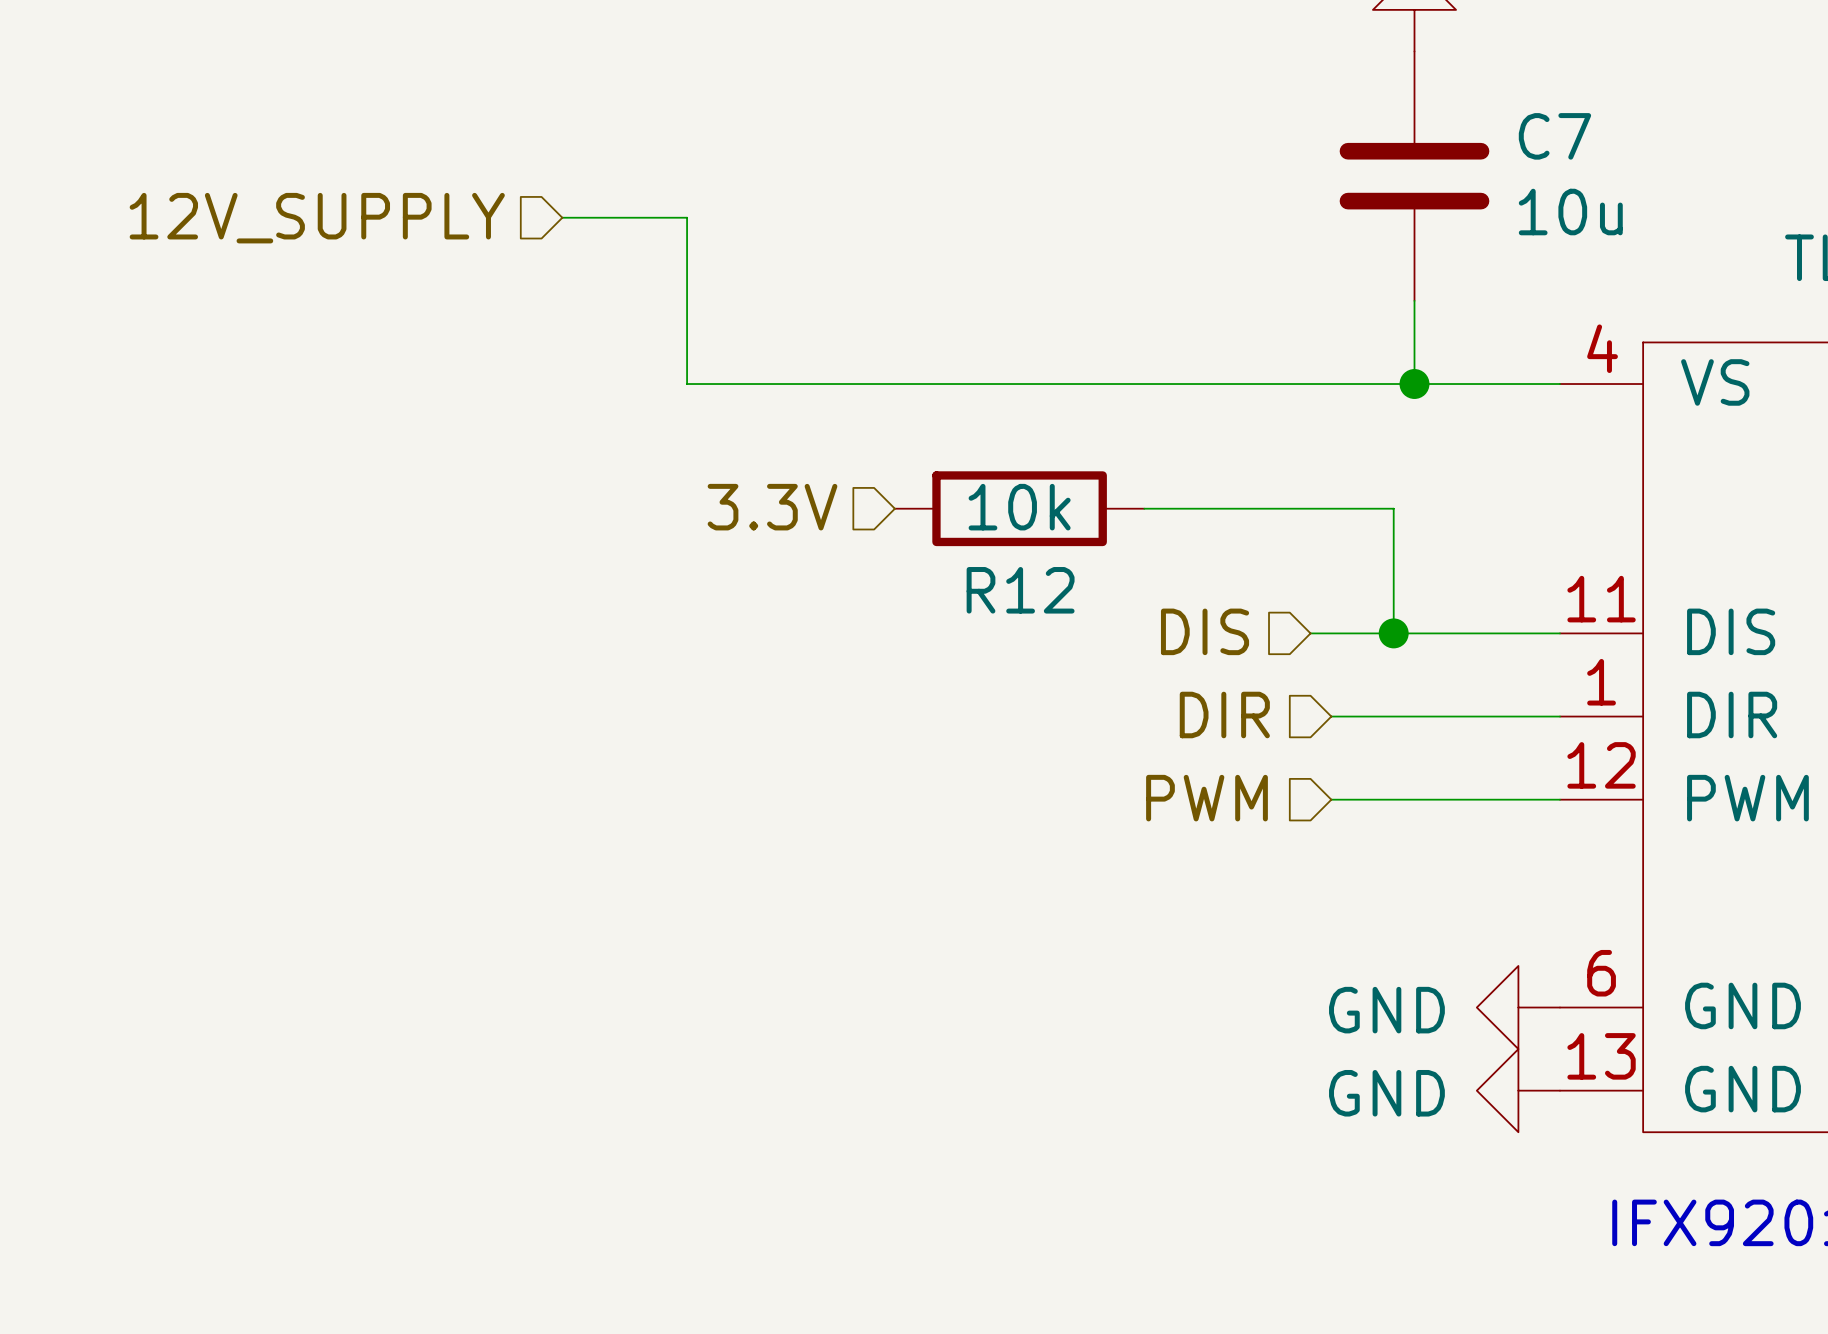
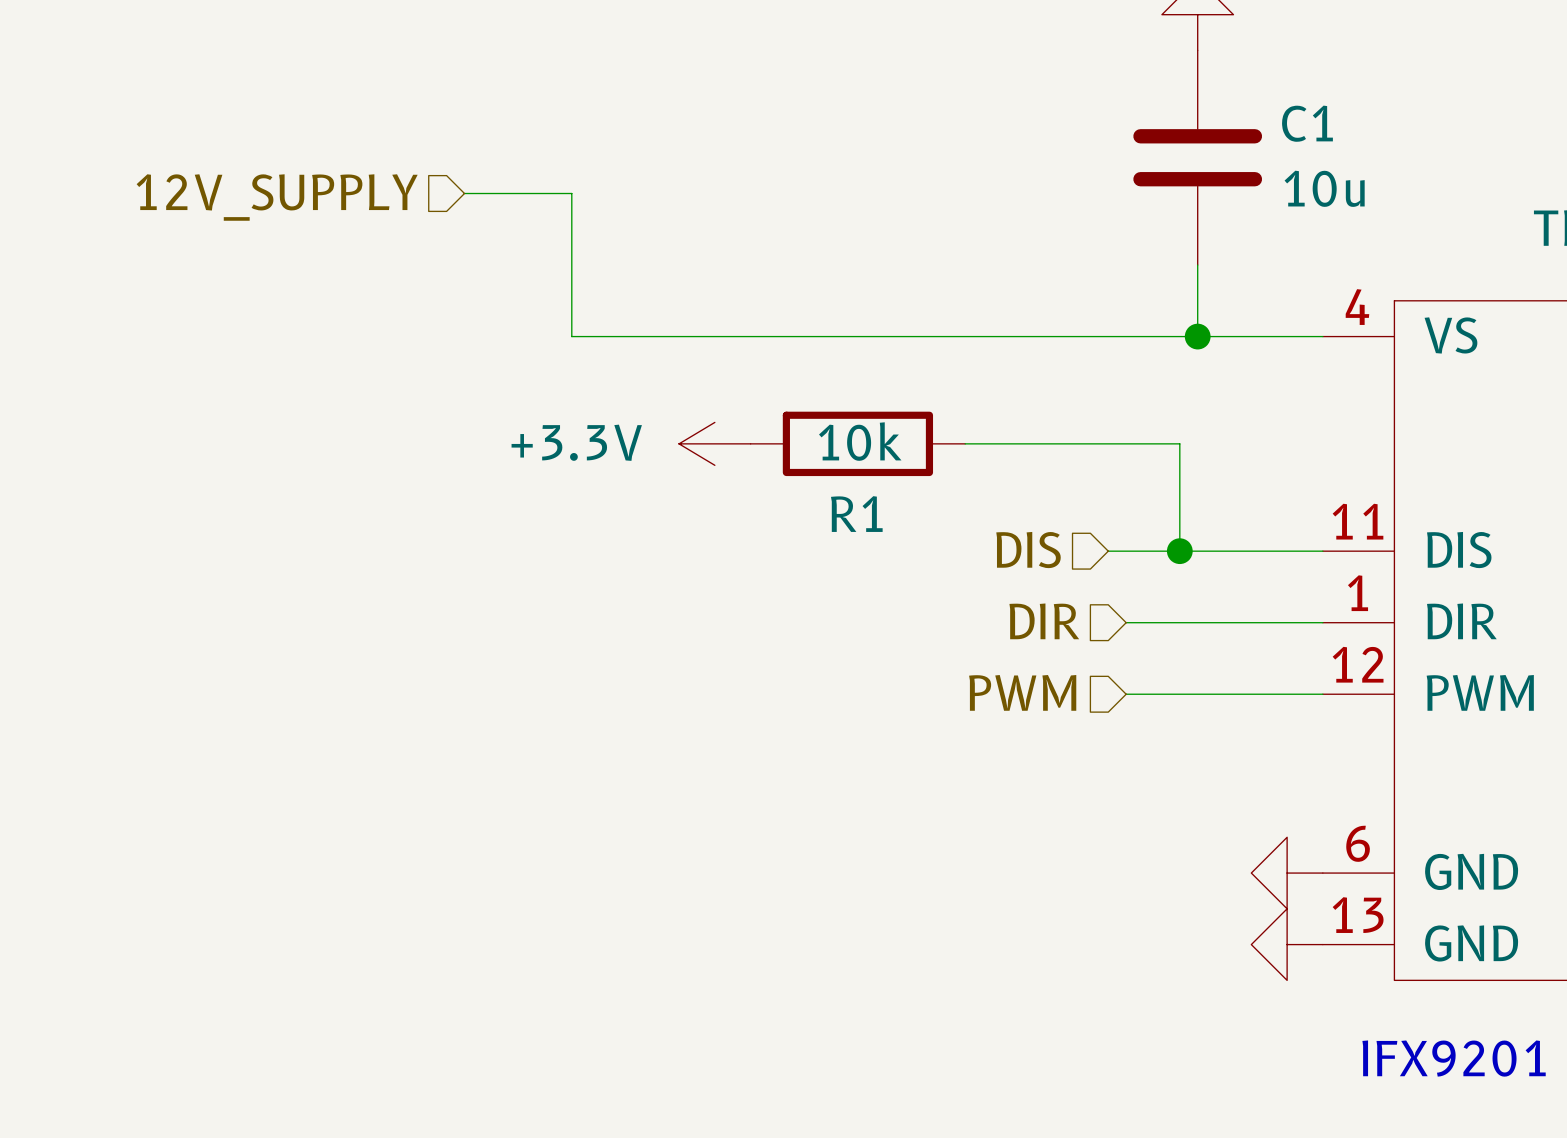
C7 name: C7 (1554, 136) -> C1 (1307, 123)
hierarchical label: 3.3V (772, 507) -> none
power symbol: none -> +3.3V (714, 443)
R12 name: R12 (1020, 590) -> R1 (856, 514)
power symbol text: GND (1386, 1010) -> none
power symbol text: GND (1386, 1093) -> none

